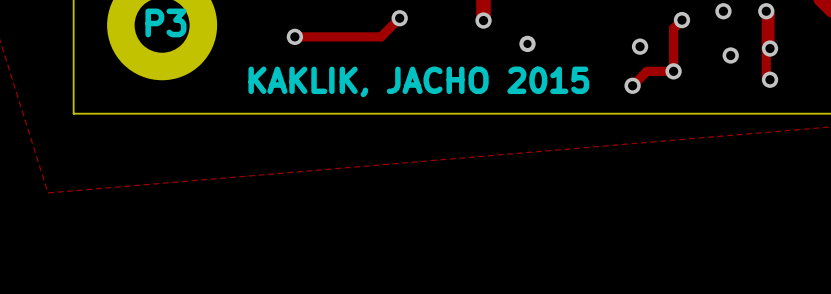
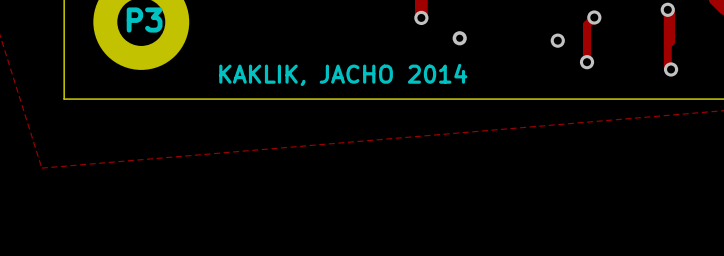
via: (723, 11) -> none
track: (399, 18) (381, 36) (294, 36) -> none
via: (399, 18) -> none
via: (294, 36) -> none
via: (770, 48) -> none
via: (730, 55) -> none
track: (673, 71) (647, 71) (632, 85) -> none
text: KAKLIK, JACHO 2015 (418, 81) -> KAKLIK, JACHO (306, 75)
text: none -> 2014 (437, 73)
via: (632, 85) -> none

